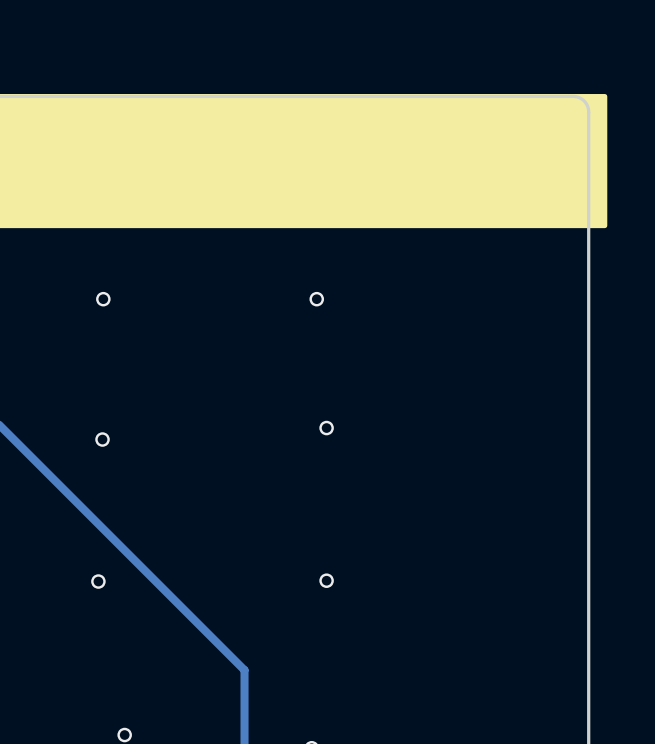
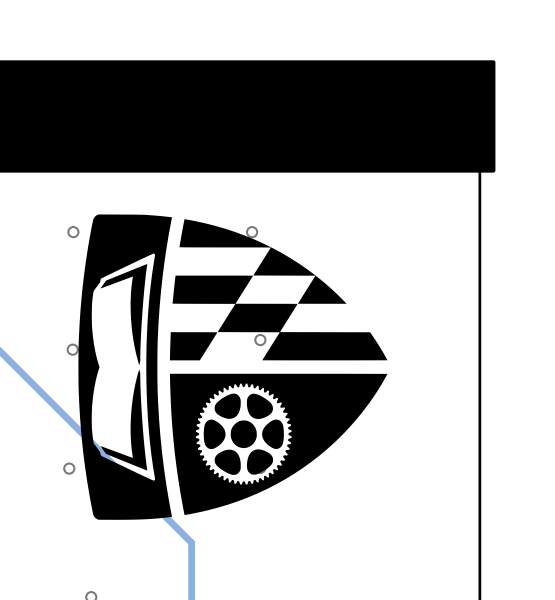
drawing: none -> [78, 214, 388, 520]

